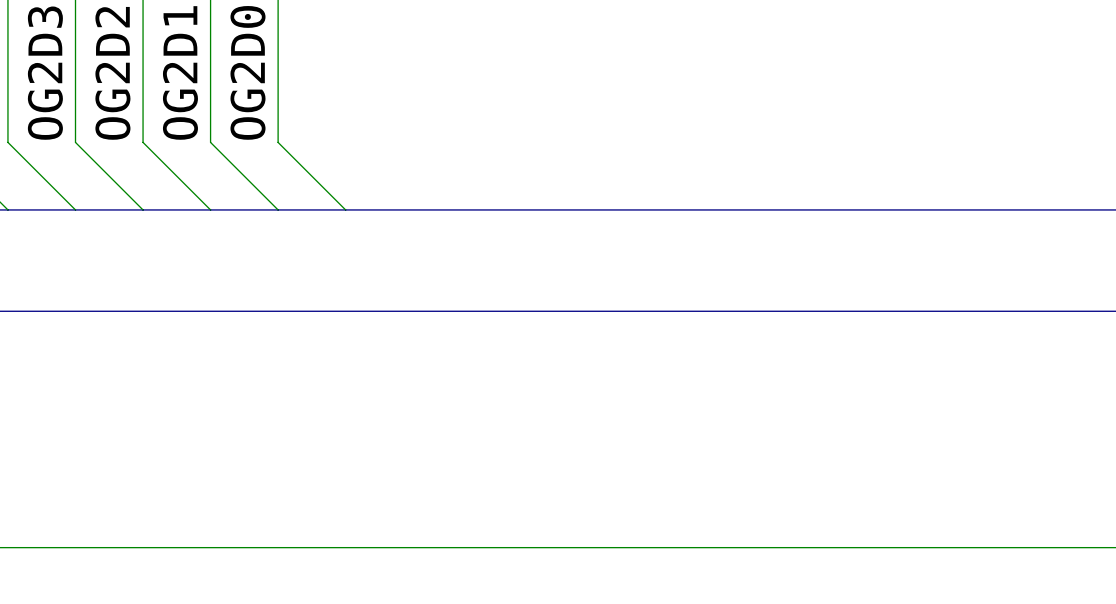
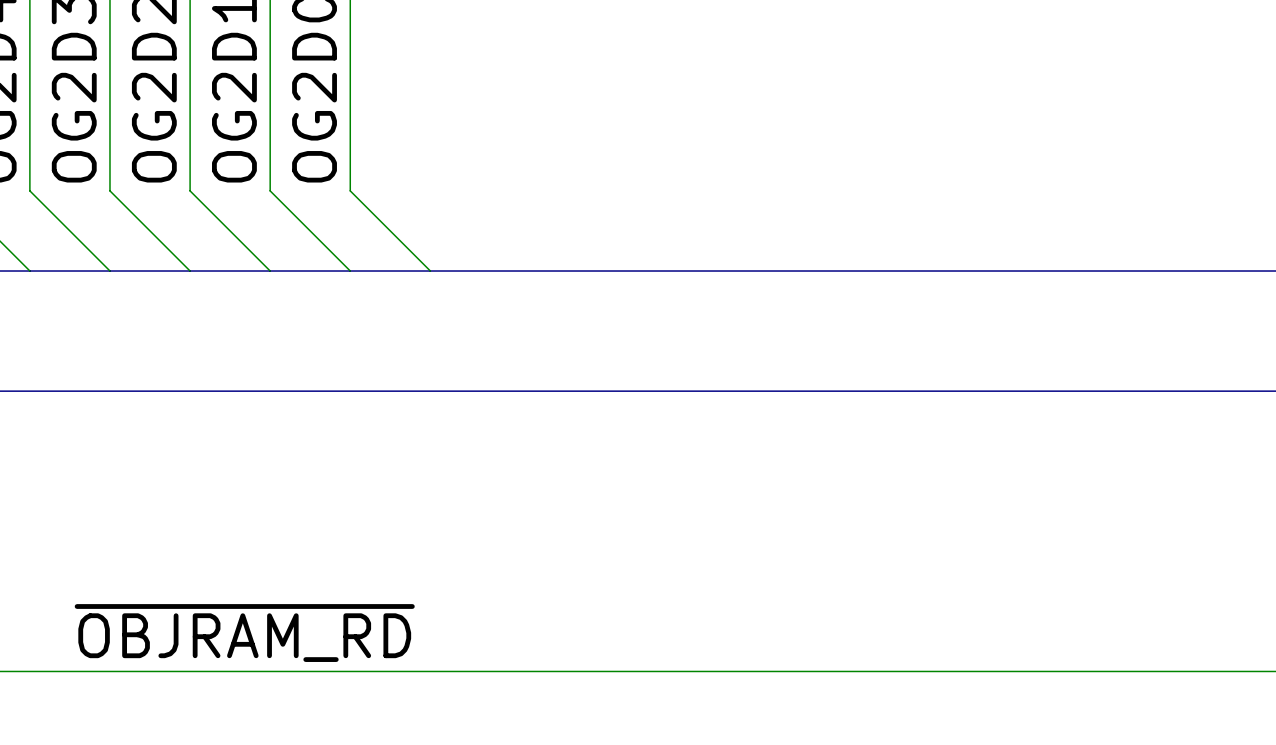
label: none -> ~{OBJRAM_RD} (244, 633)

